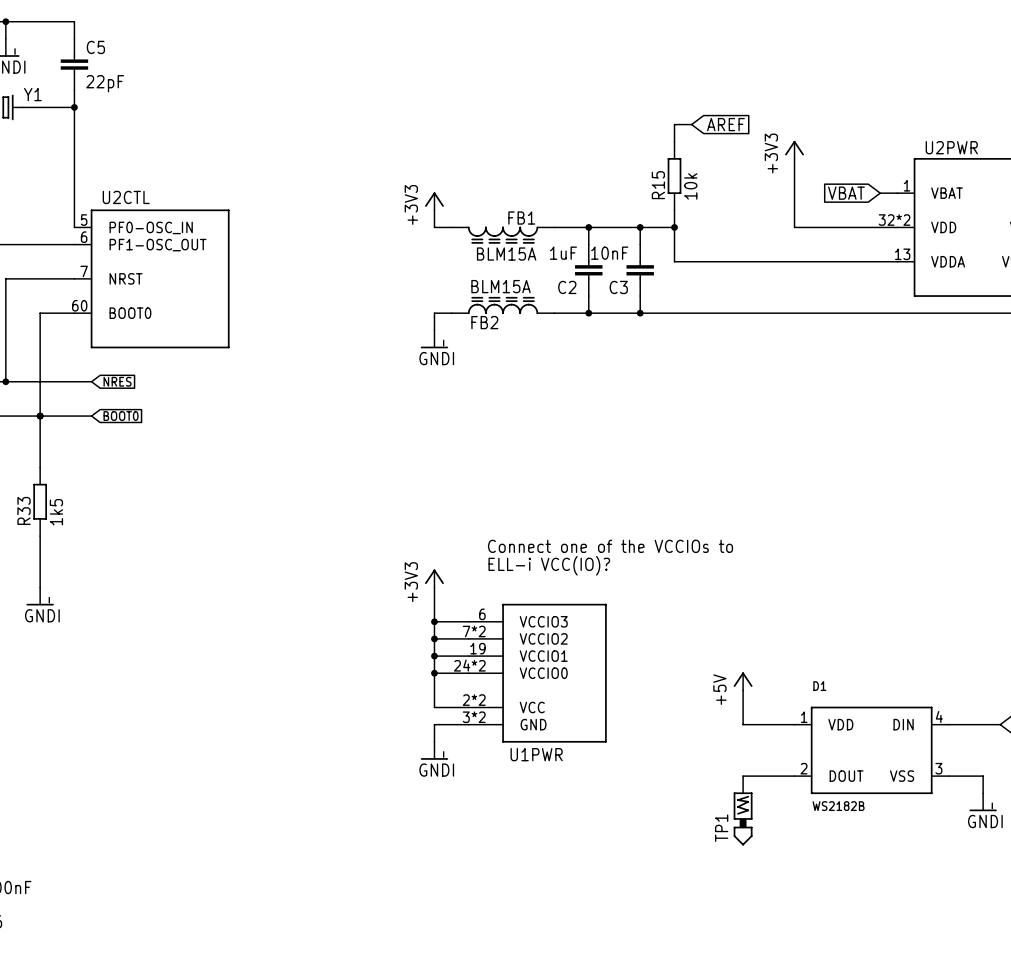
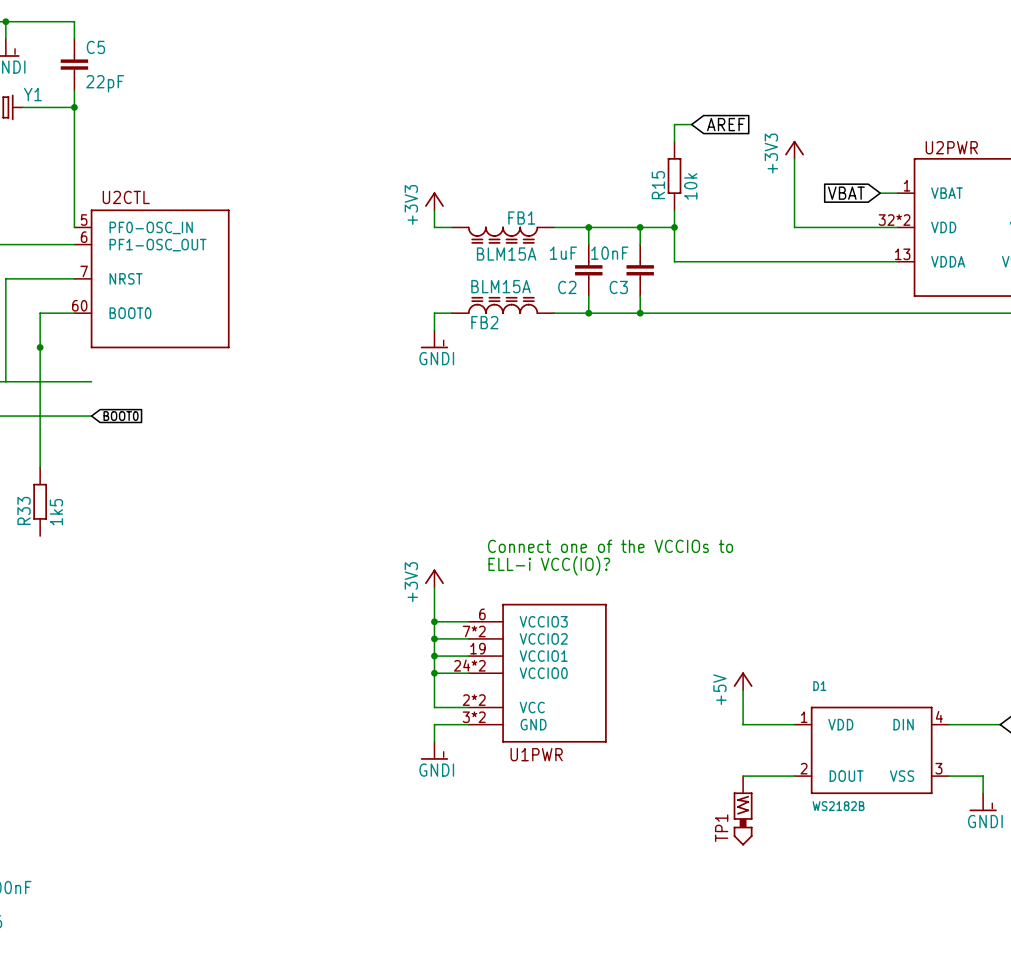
junction: none -> (40, 347)
junction: (5, 381) -> none
global label: NRES (117, 381) -> none
junction: (40, 416) -> none
wire: (40, 536) (40, 587) -> none
power symbol: GNDI (40, 596) -> none

